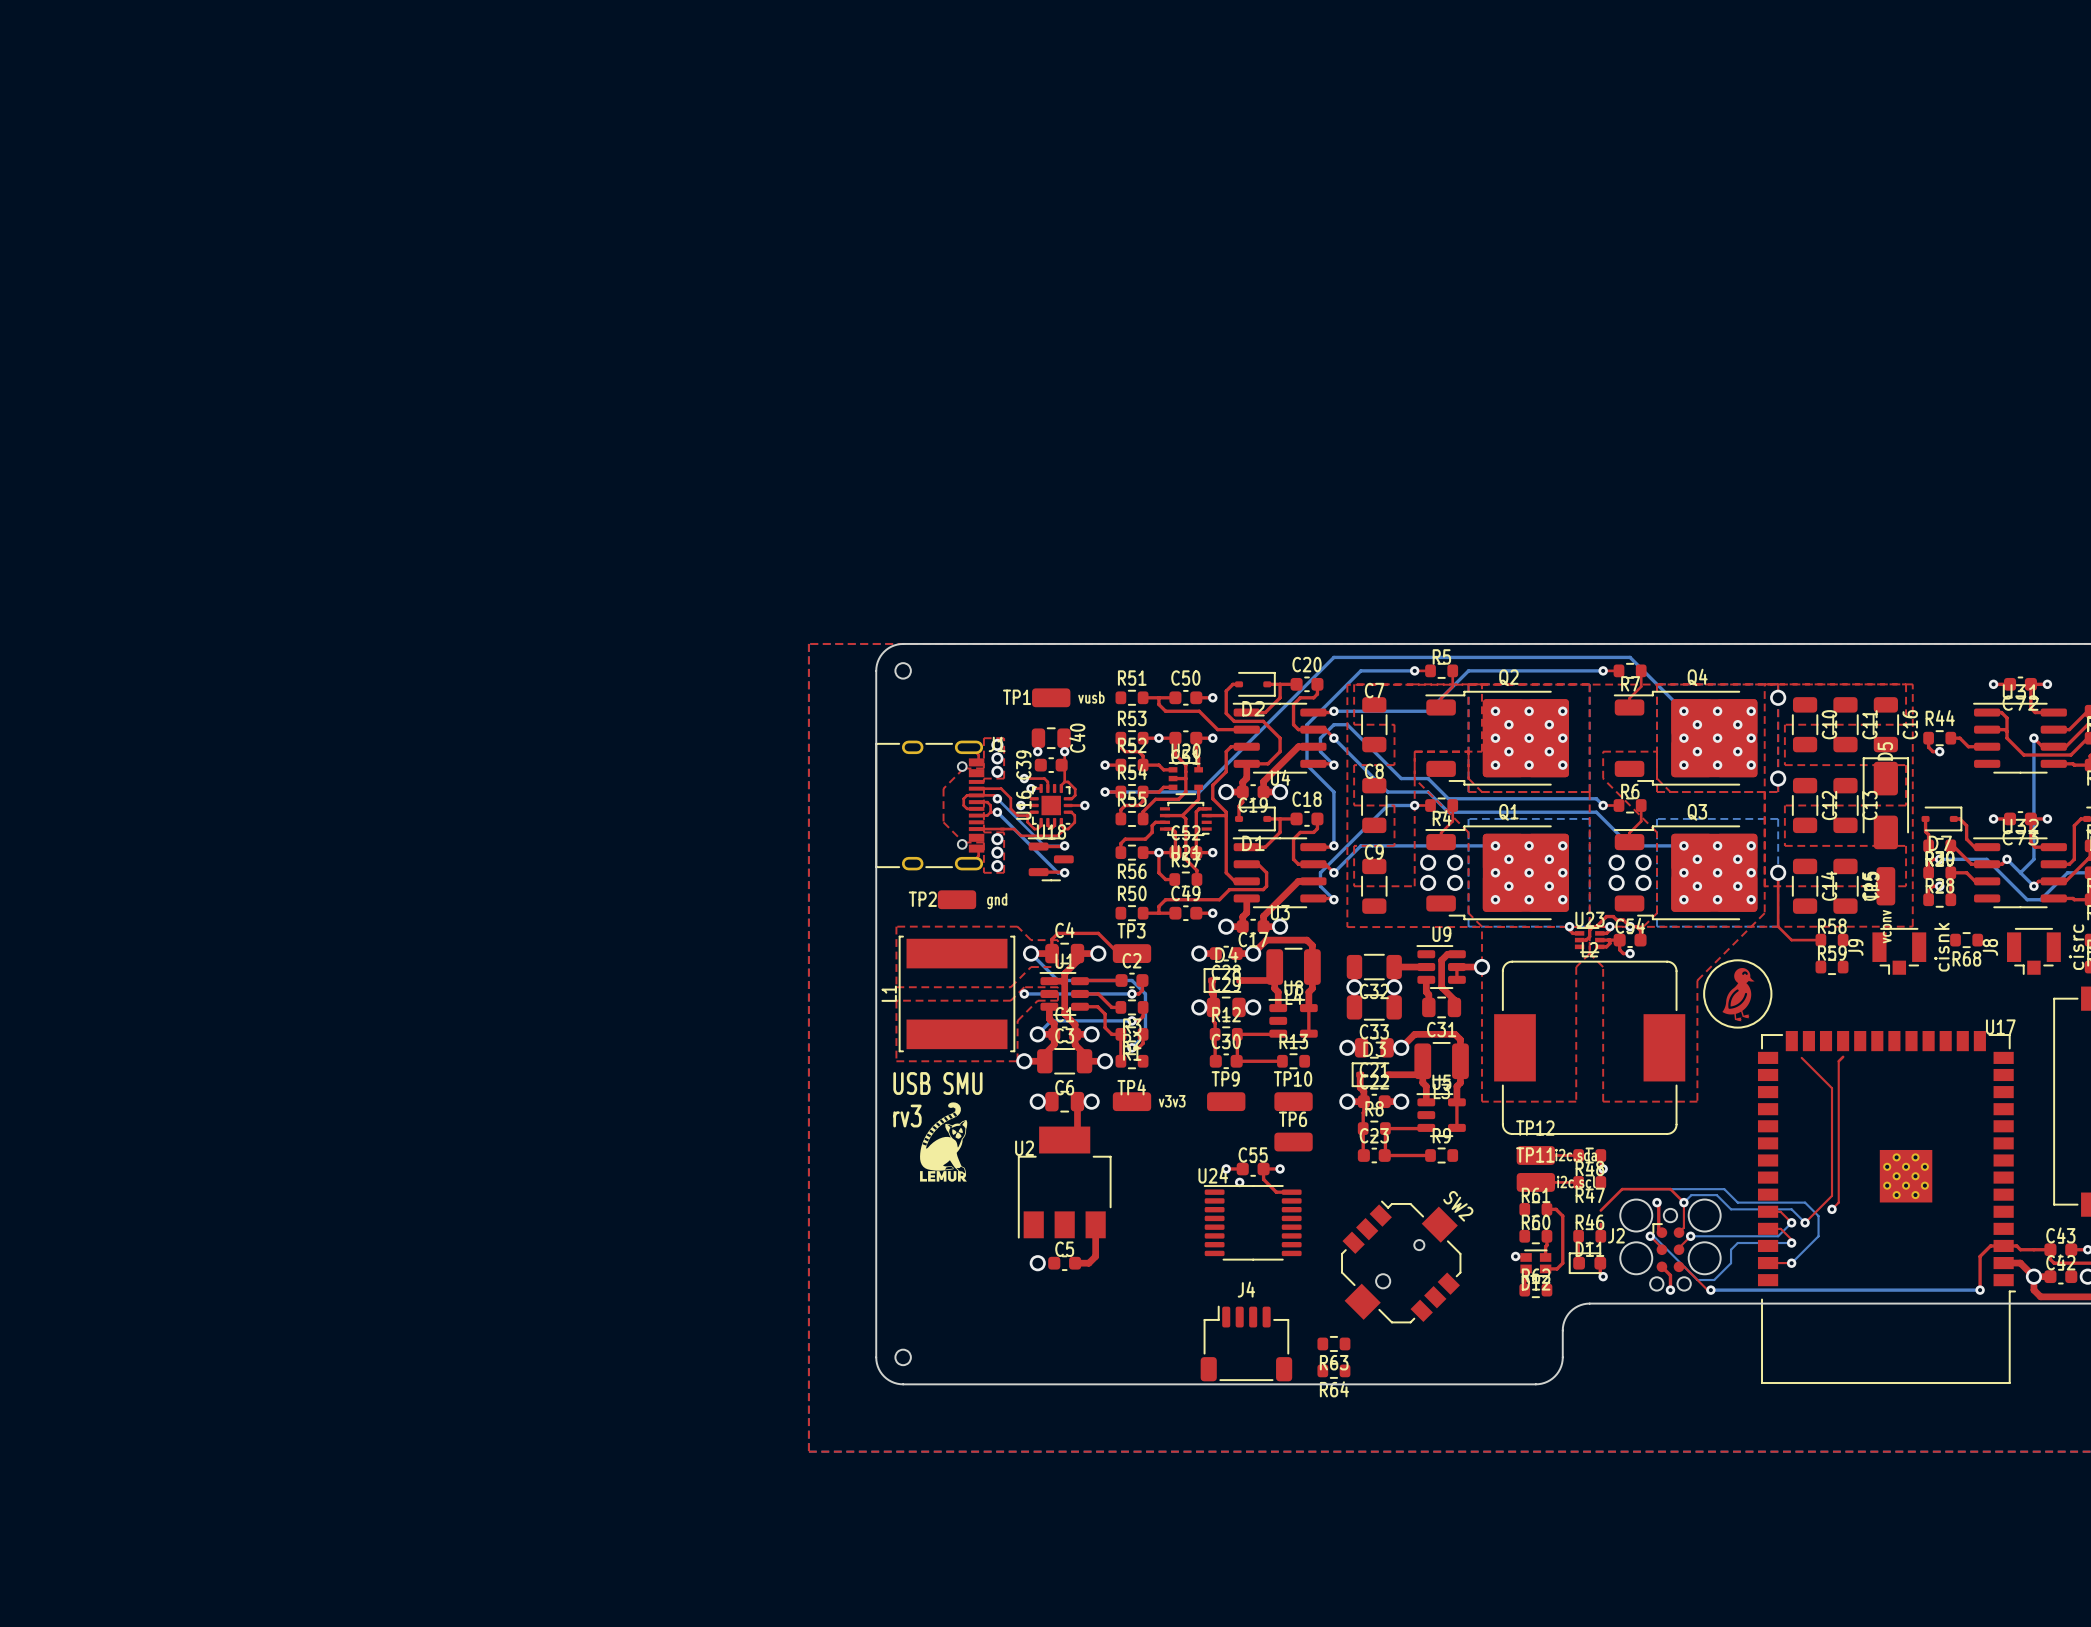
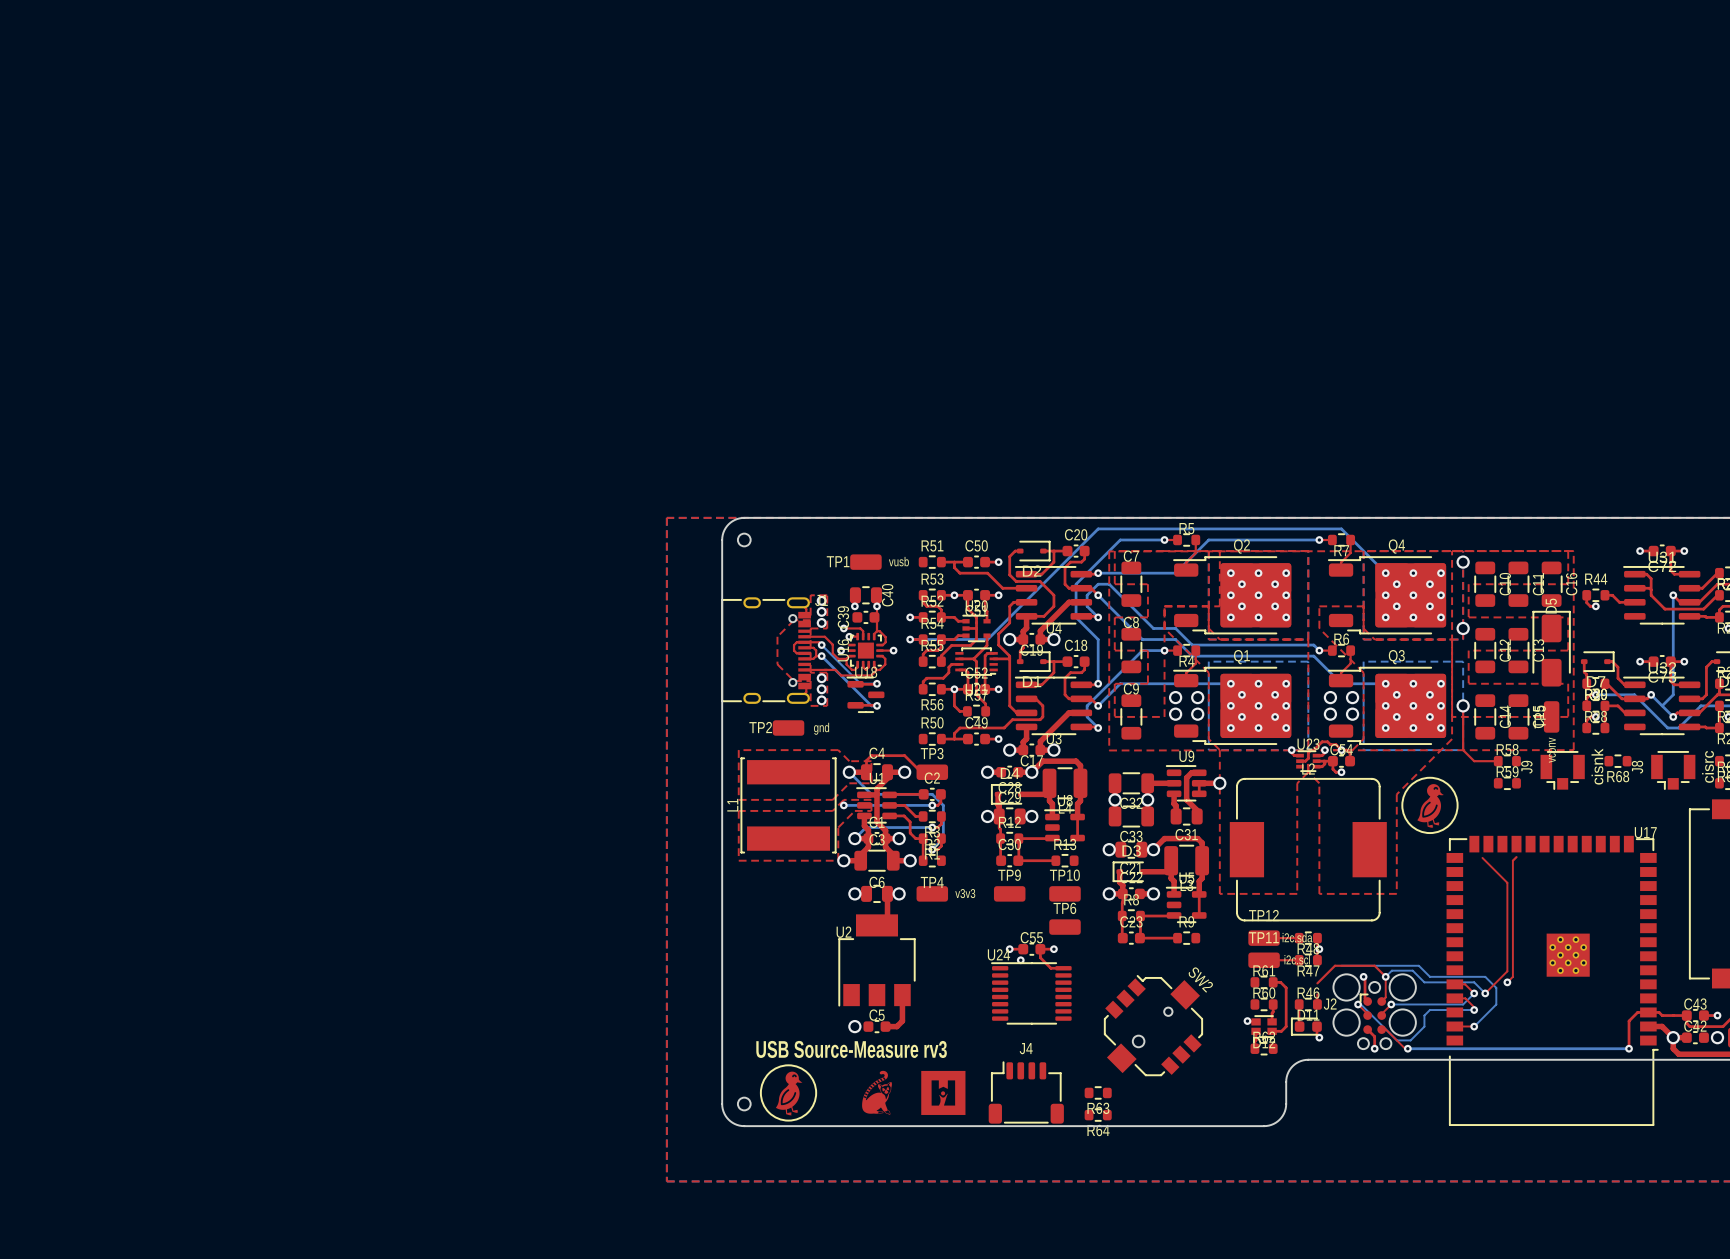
text: USB SMU (937, 1083) -> none
drawing: [920, 1102, 968, 1182] -> none
text: rv3 (907, 1116) -> none
text: none -> USB Source-Measure rv3 (851, 1049)
part: none -> (788, 1092)
part: none -> (876, 1092)
part: none -> (943, 1092)

